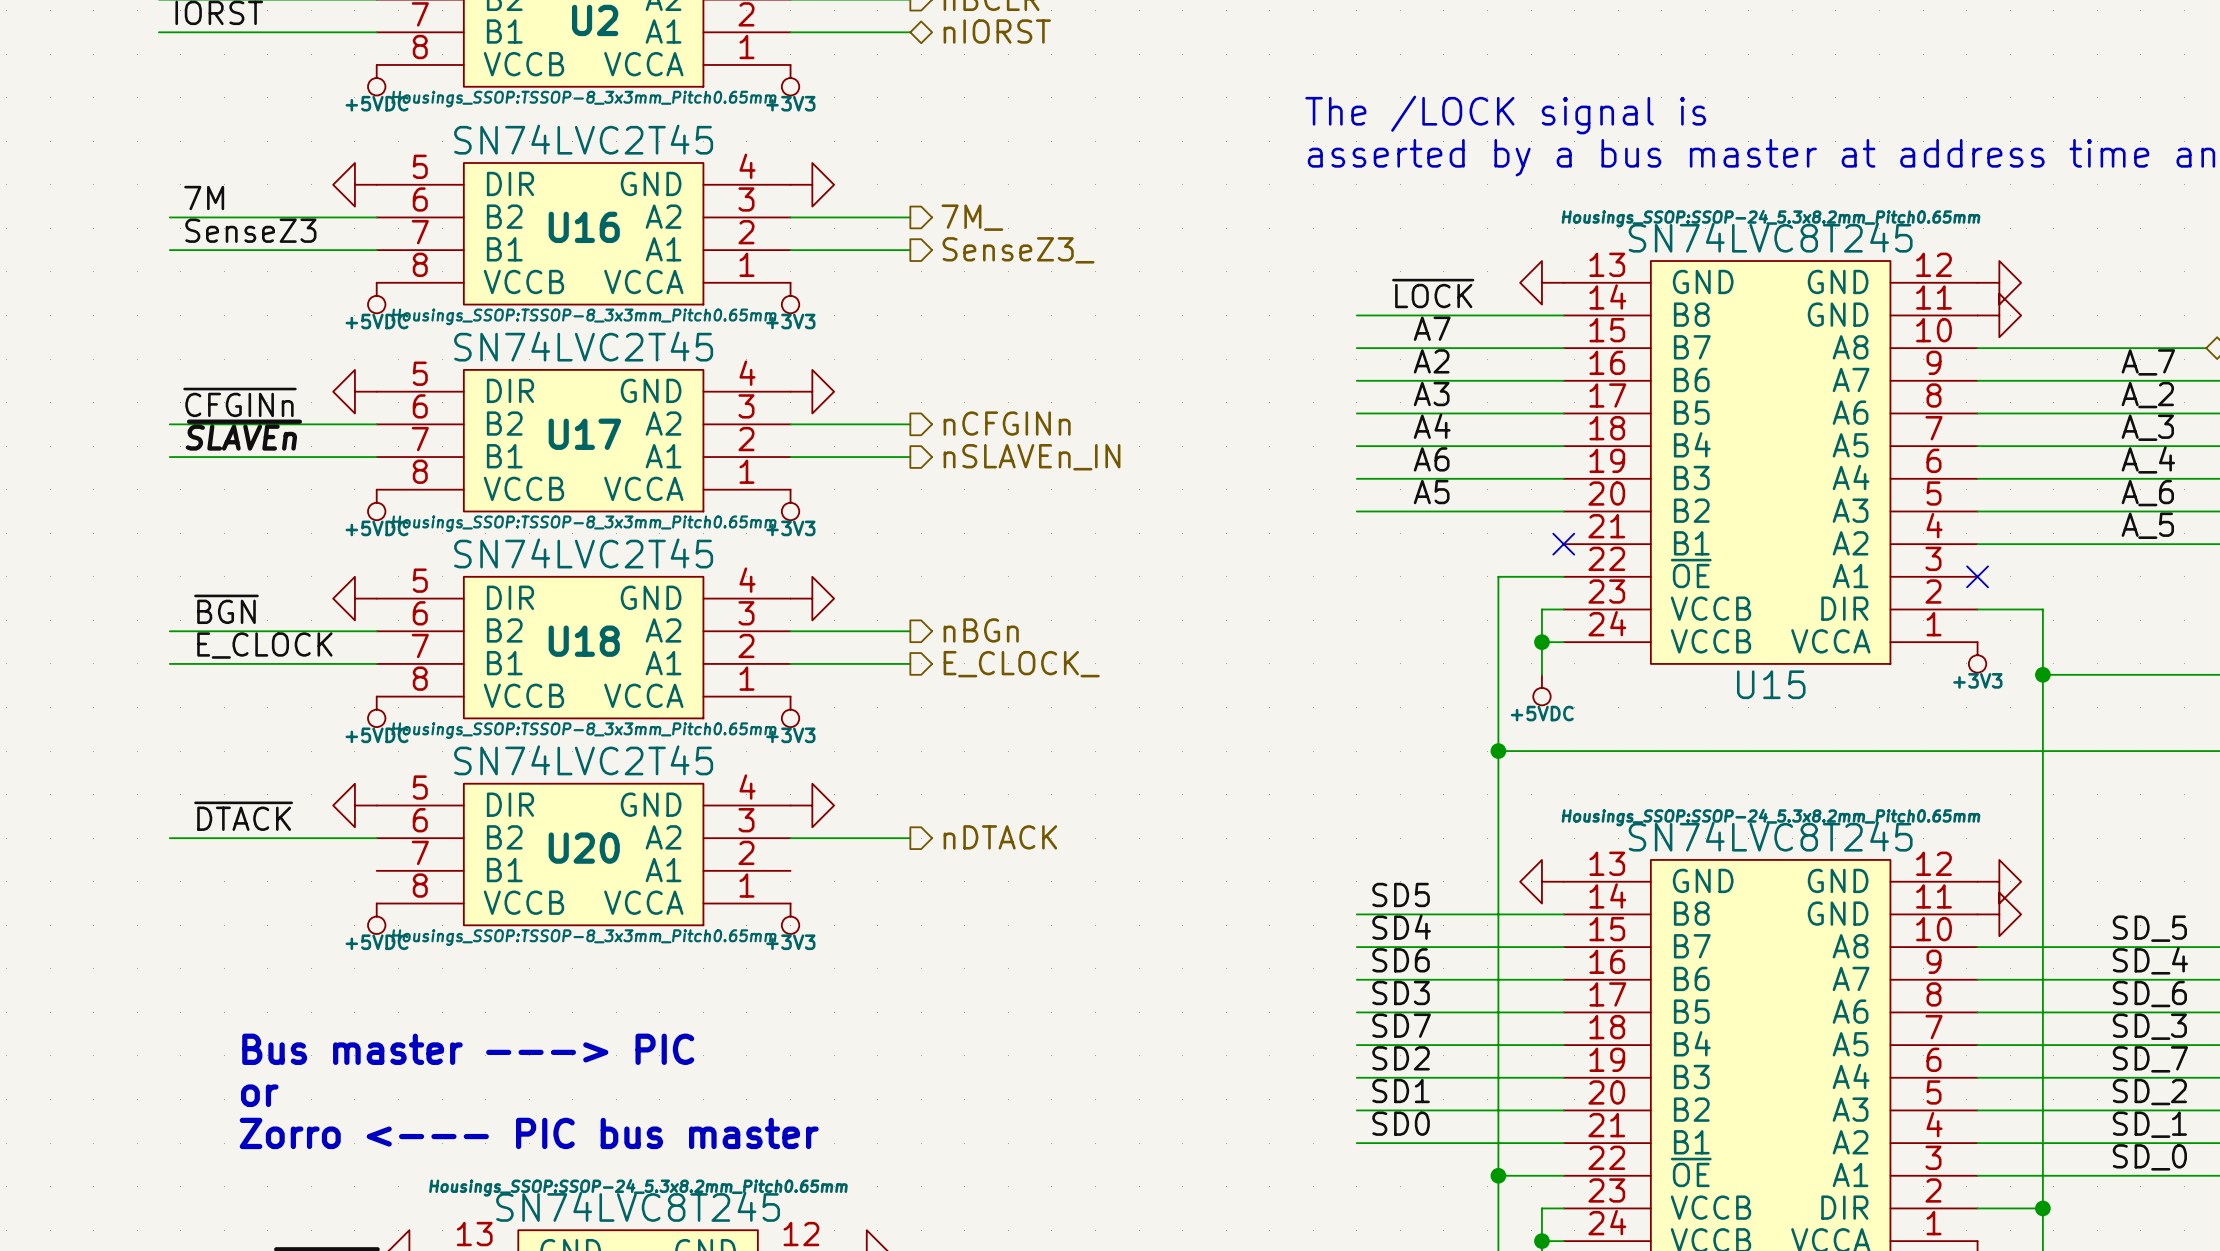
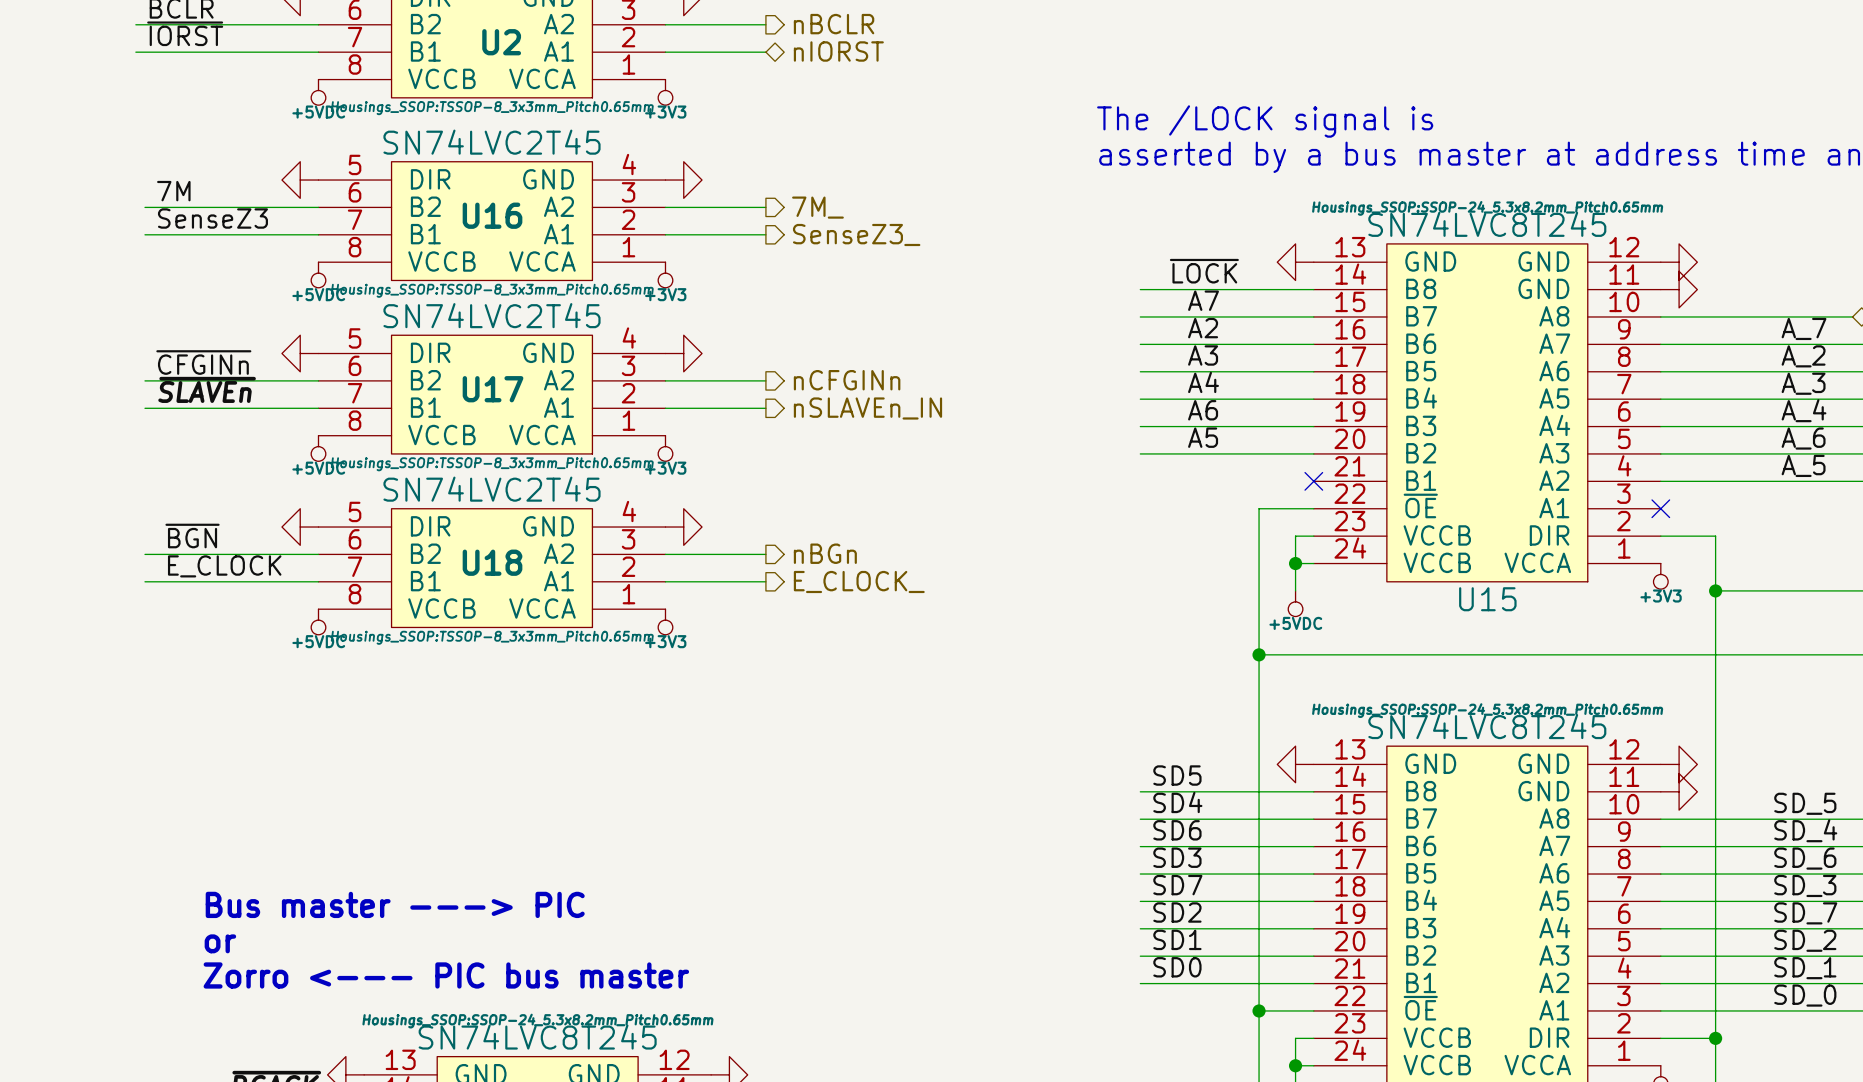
power symbol: (354, 805) -> none
power symbol: (812, 805) -> none
label: ~{DTACK} (243, 816) -> none
hierarchical label: nDTACK (1000, 837) -> none
wire: (169, 838) (376, 838) -> none
wire: (790, 838) (910, 838) -> none
U20: SN74LVC2T45 (583, 854) -> none
power symbol: +5VDC (376, 918) -> none
power symbol: +3V3 (790, 918) -> none

